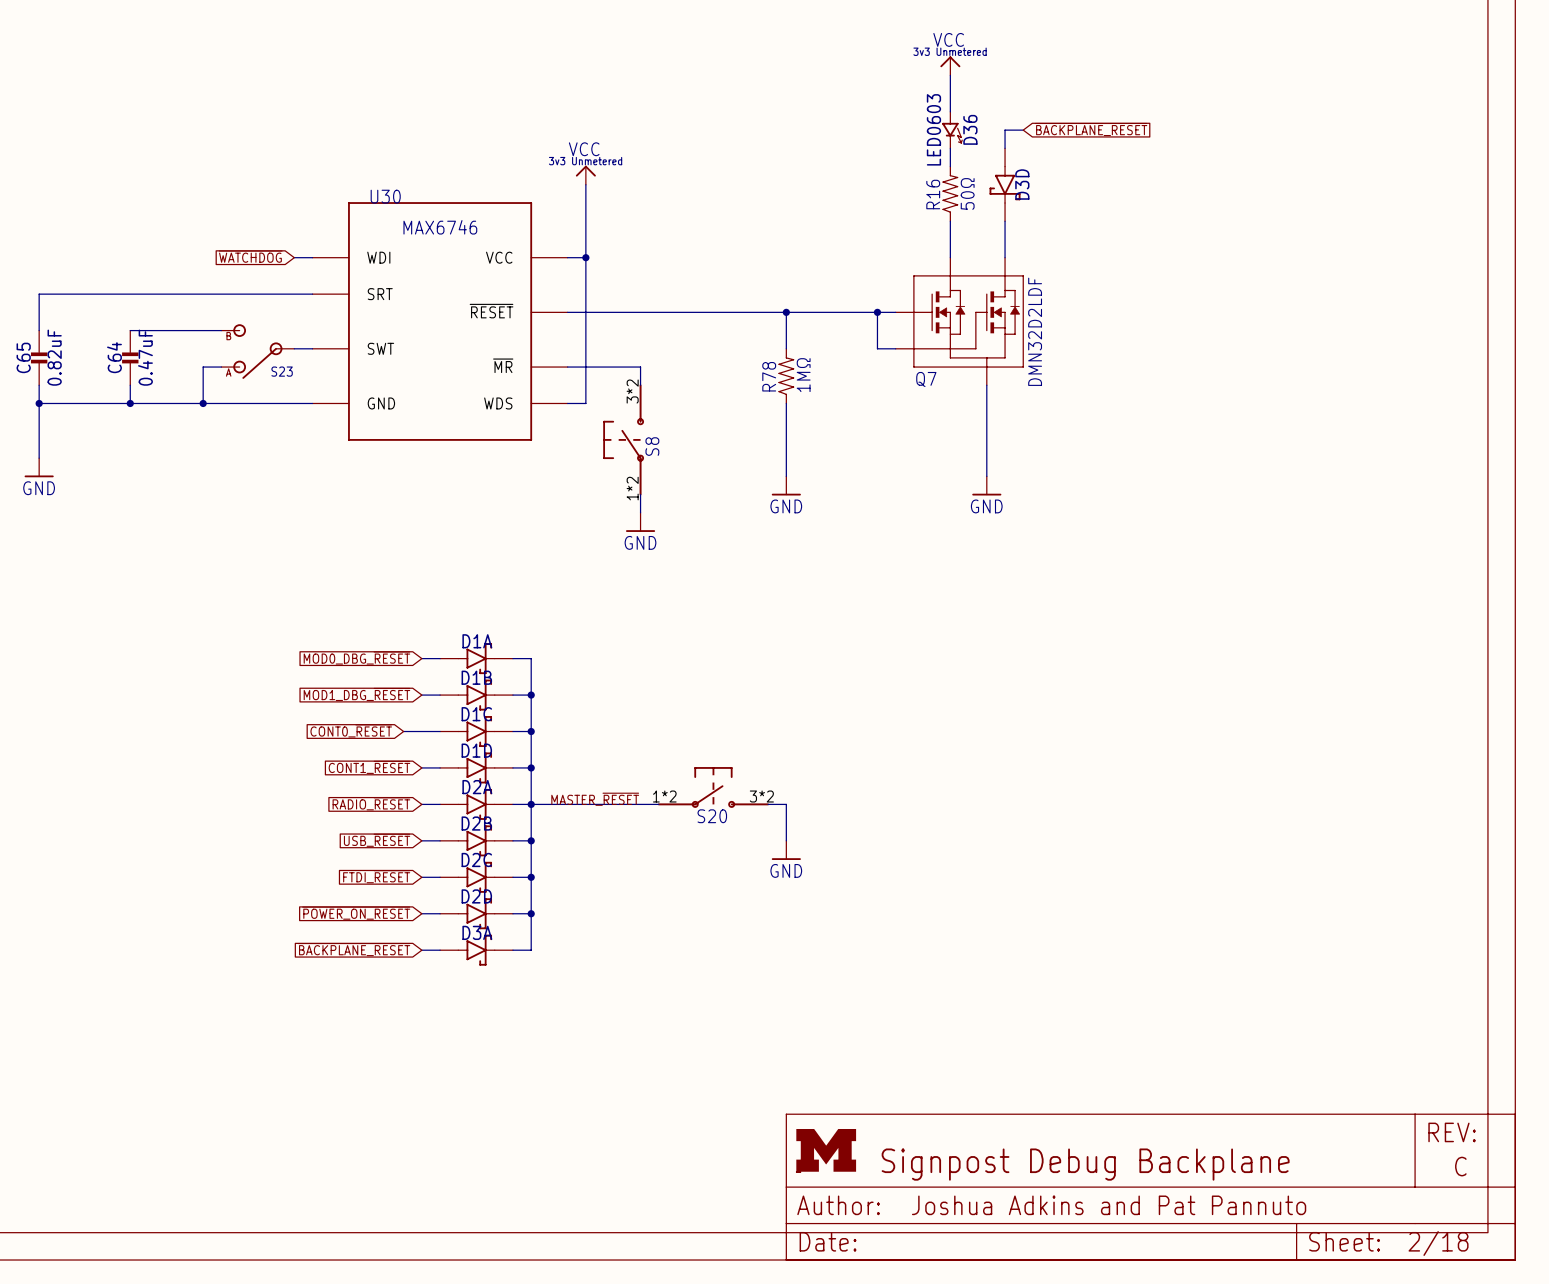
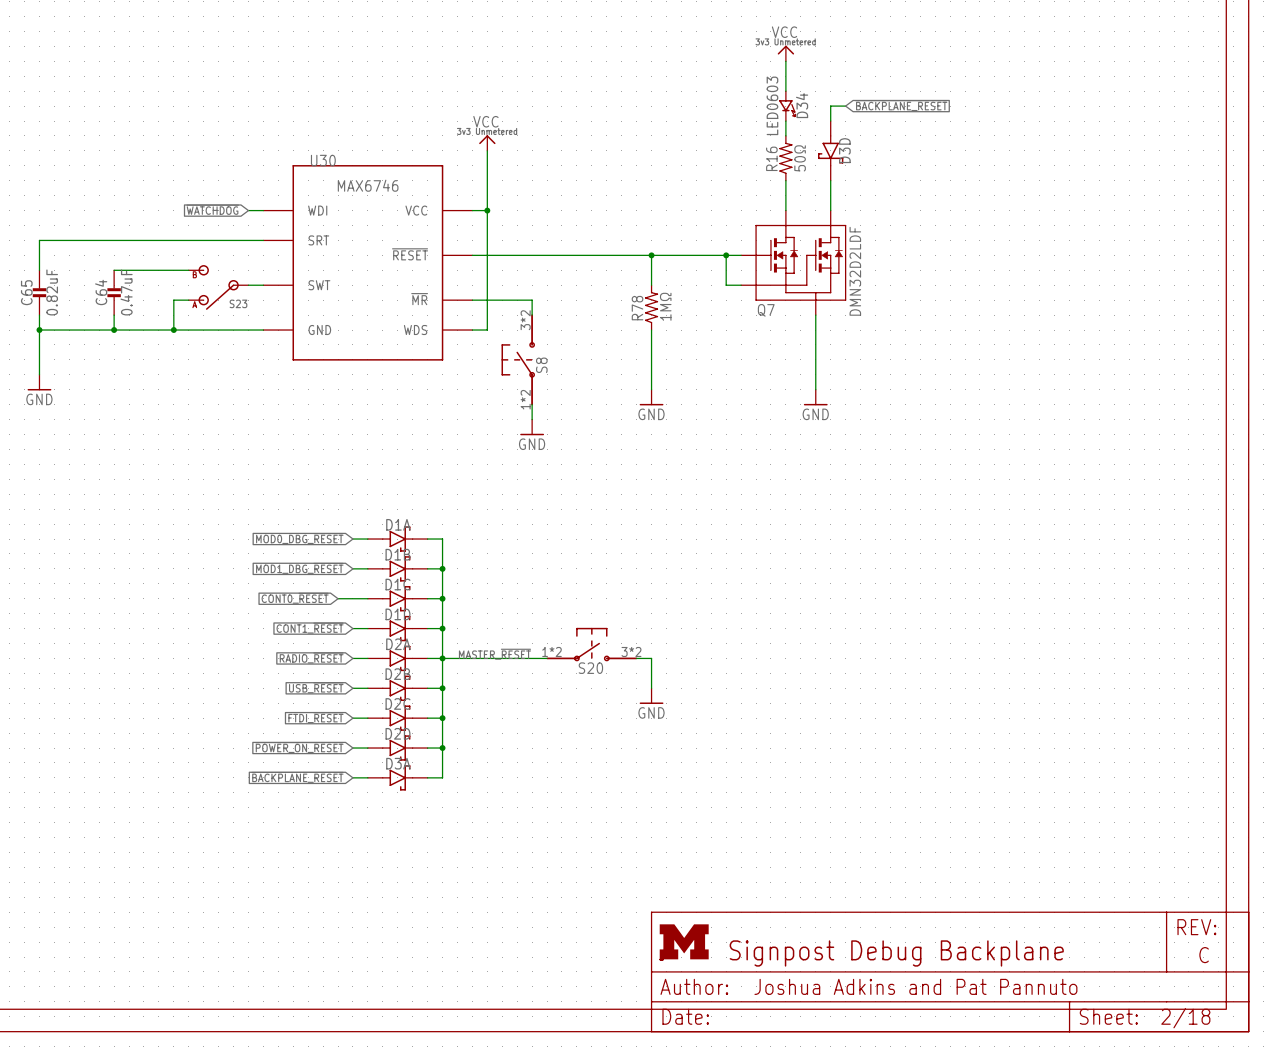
D36 name: D36 (970, 129) -> D34 (802, 105)

